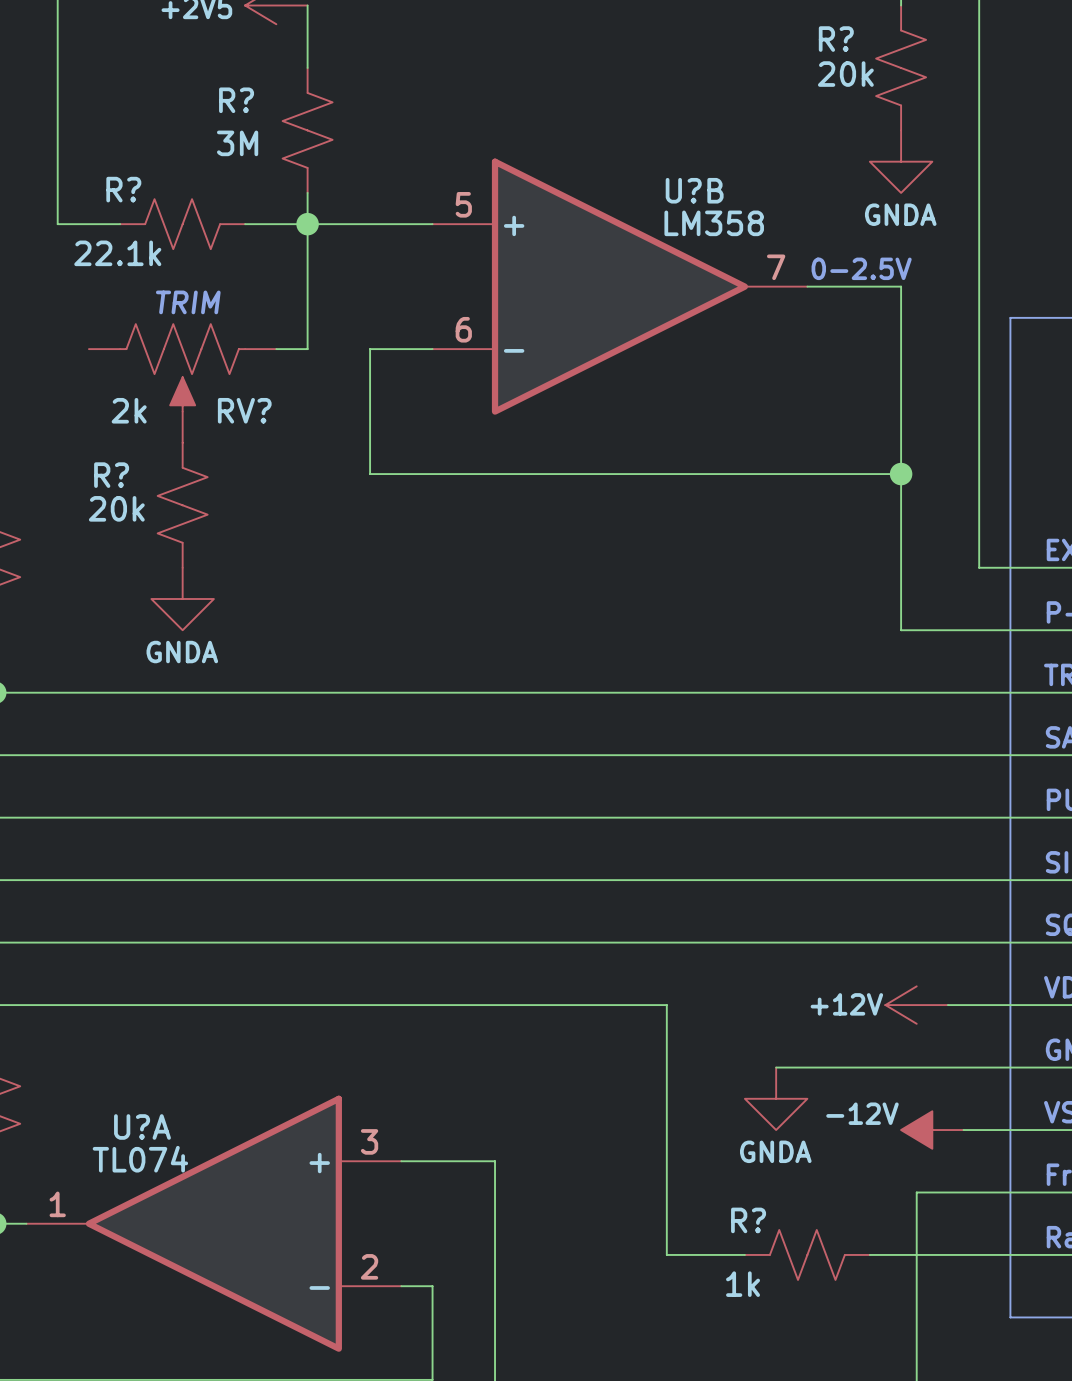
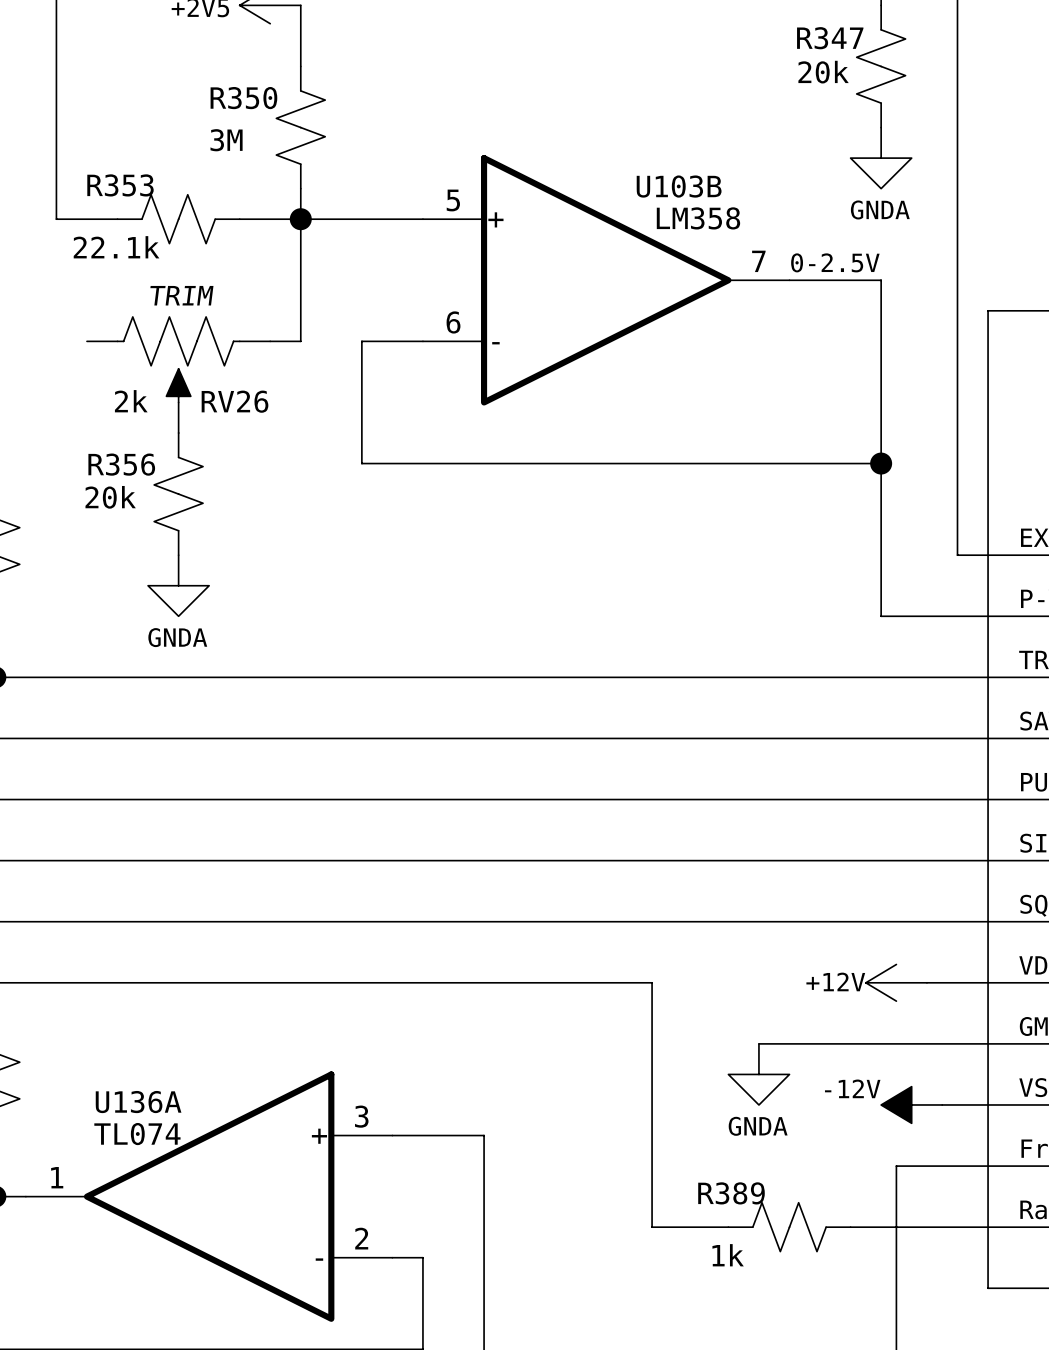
R? name: R? (836, 39) -> R347 (830, 38)
R? name: R? (236, 100) -> R350 (243, 98)
R? name: R? (123, 189) -> R353 (120, 185)
U?B name: U?B (694, 190) -> U103B (679, 186)
RV? name: RV? (244, 410) -> RV26 (235, 401)
R? name: R? (111, 475) -> R356 (121, 464)
U?A name: U?A (142, 1126) -> U136A (138, 1102)
R? name: R? (748, 1220) -> R389 (731, 1193)

